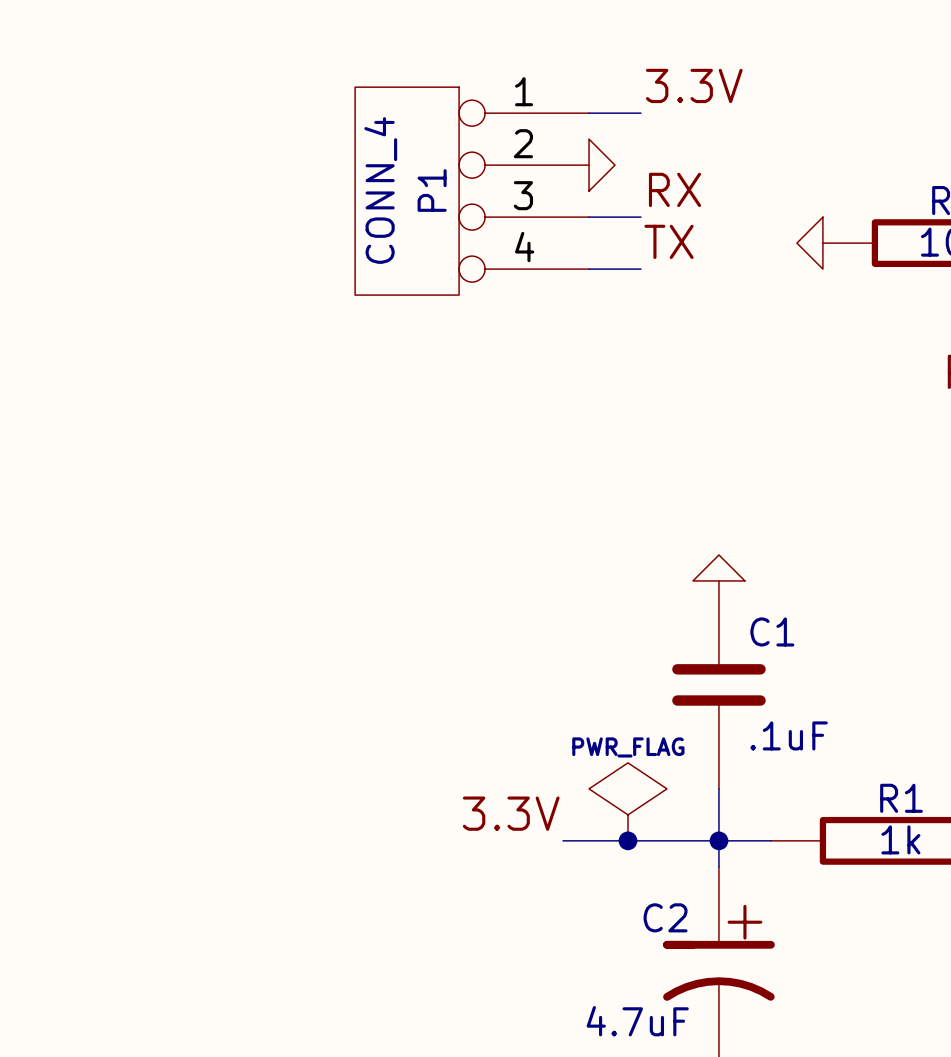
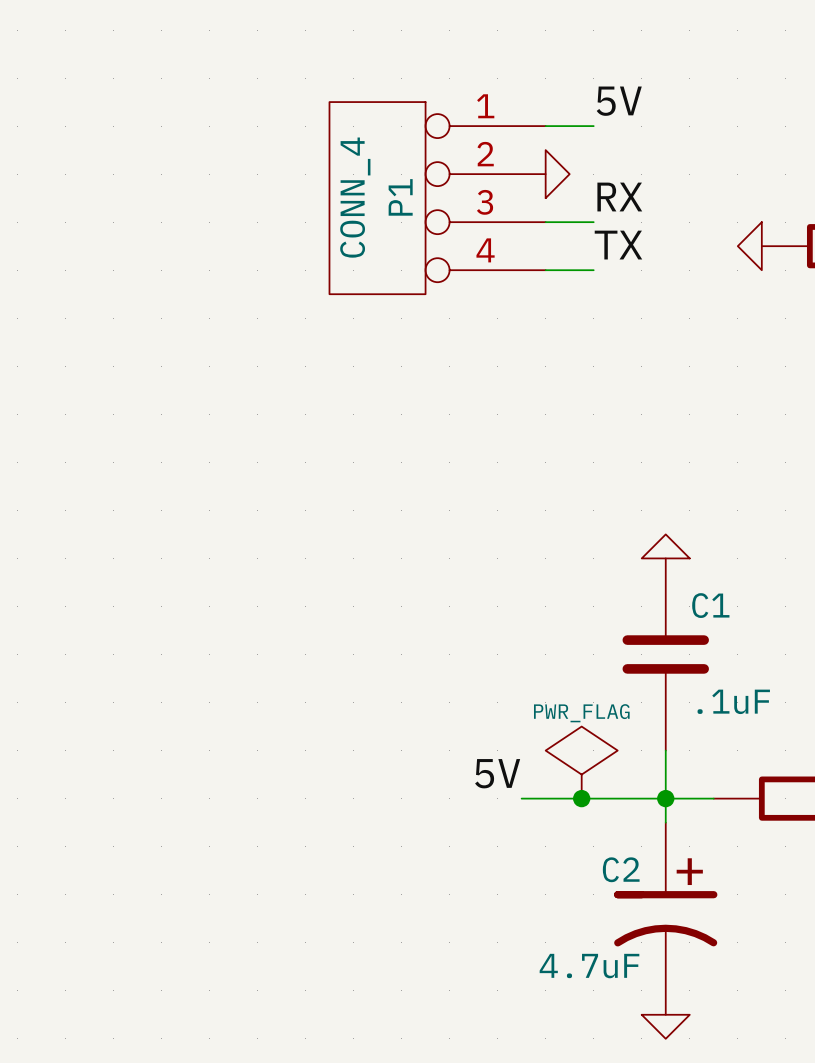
label: 3.3V (694, 85) -> 5V (619, 101)
label: 3.3V (511, 813) -> 5V (497, 773)

